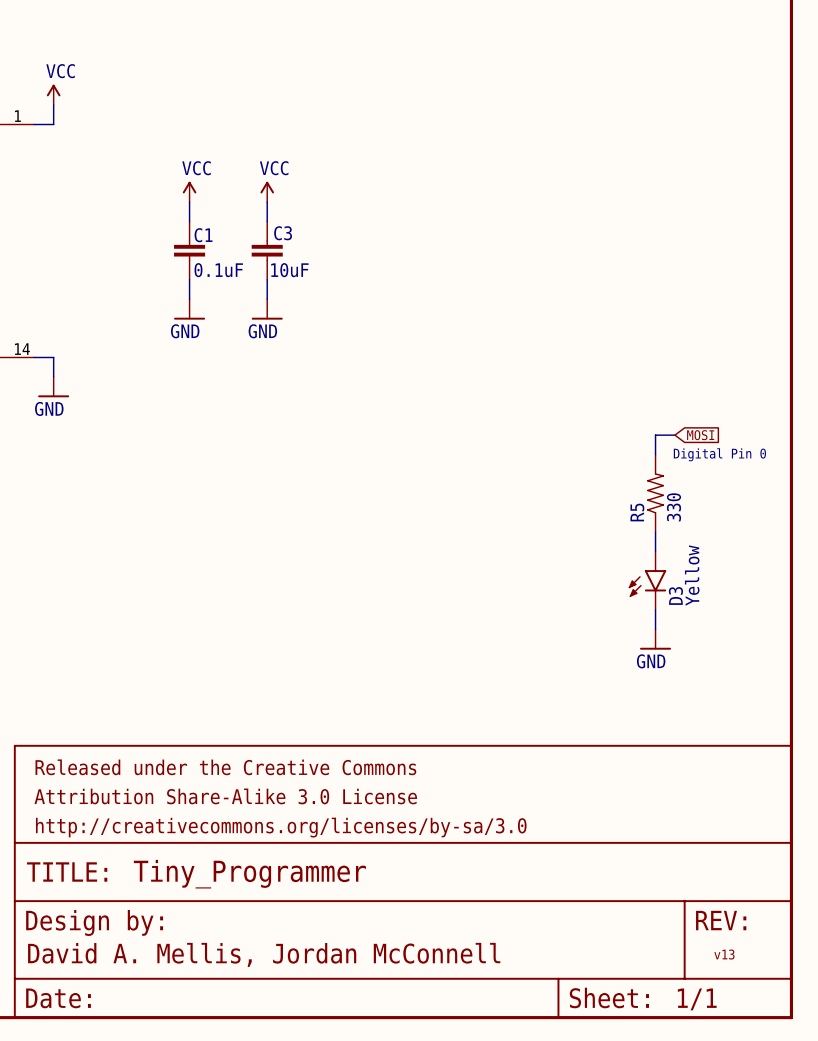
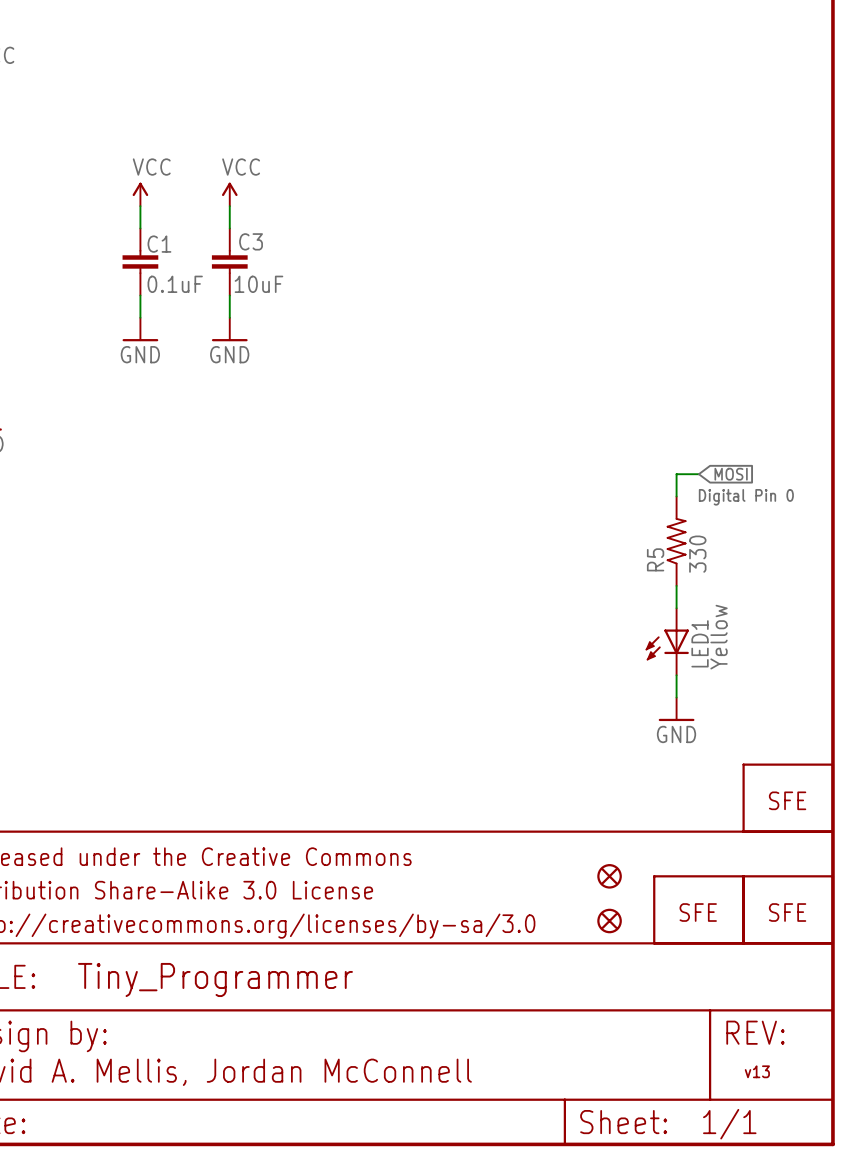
D3: Yellow (647, 580) -> none
LED1: none -> Yellow (667, 641)
part: none -> (788, 798)
part: none -> (609, 876)
part: none -> (698, 909)
part: none -> (788, 909)
part: none -> (609, 921)

